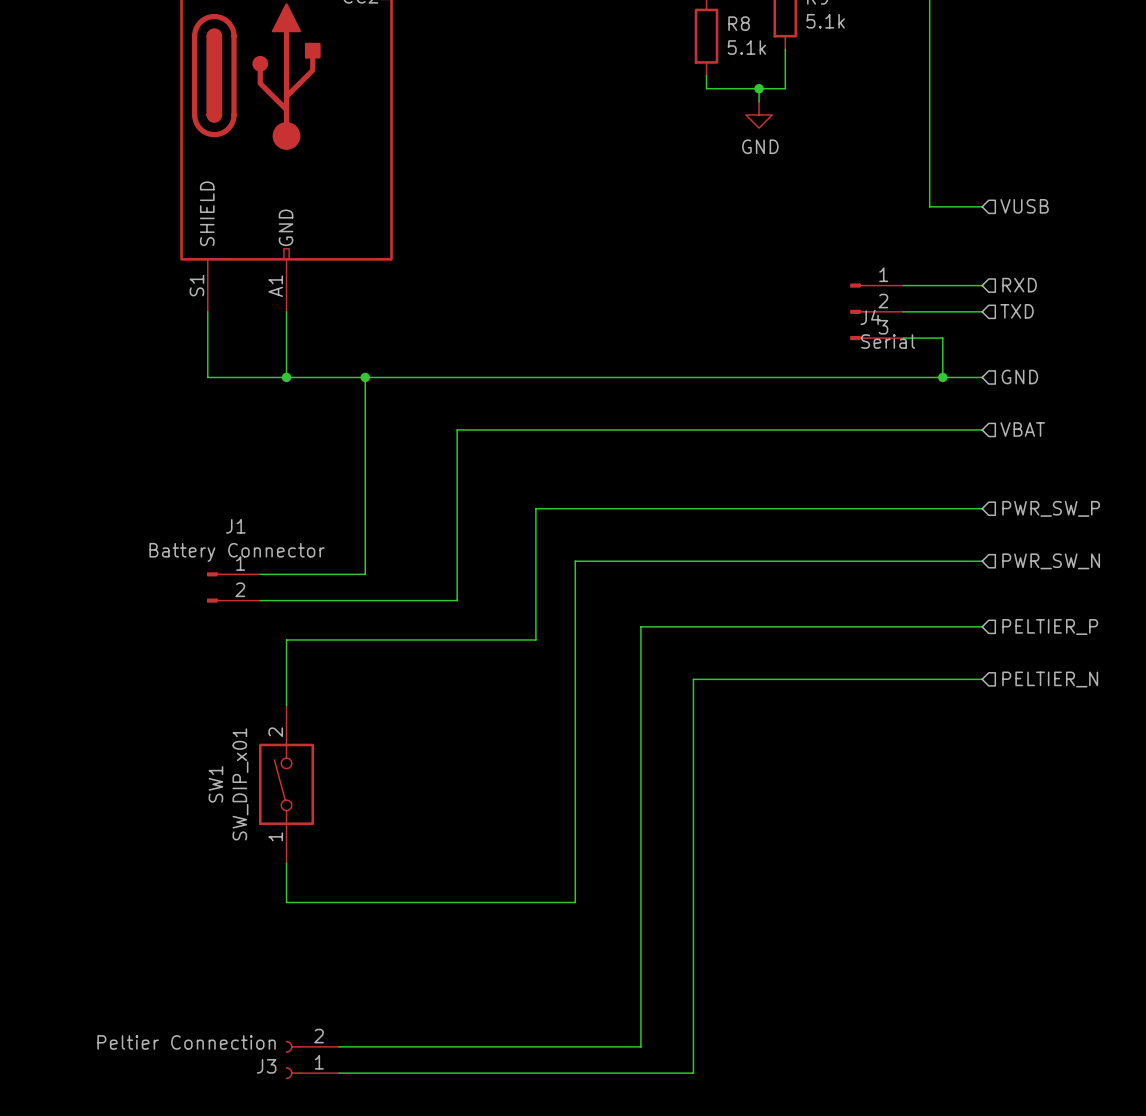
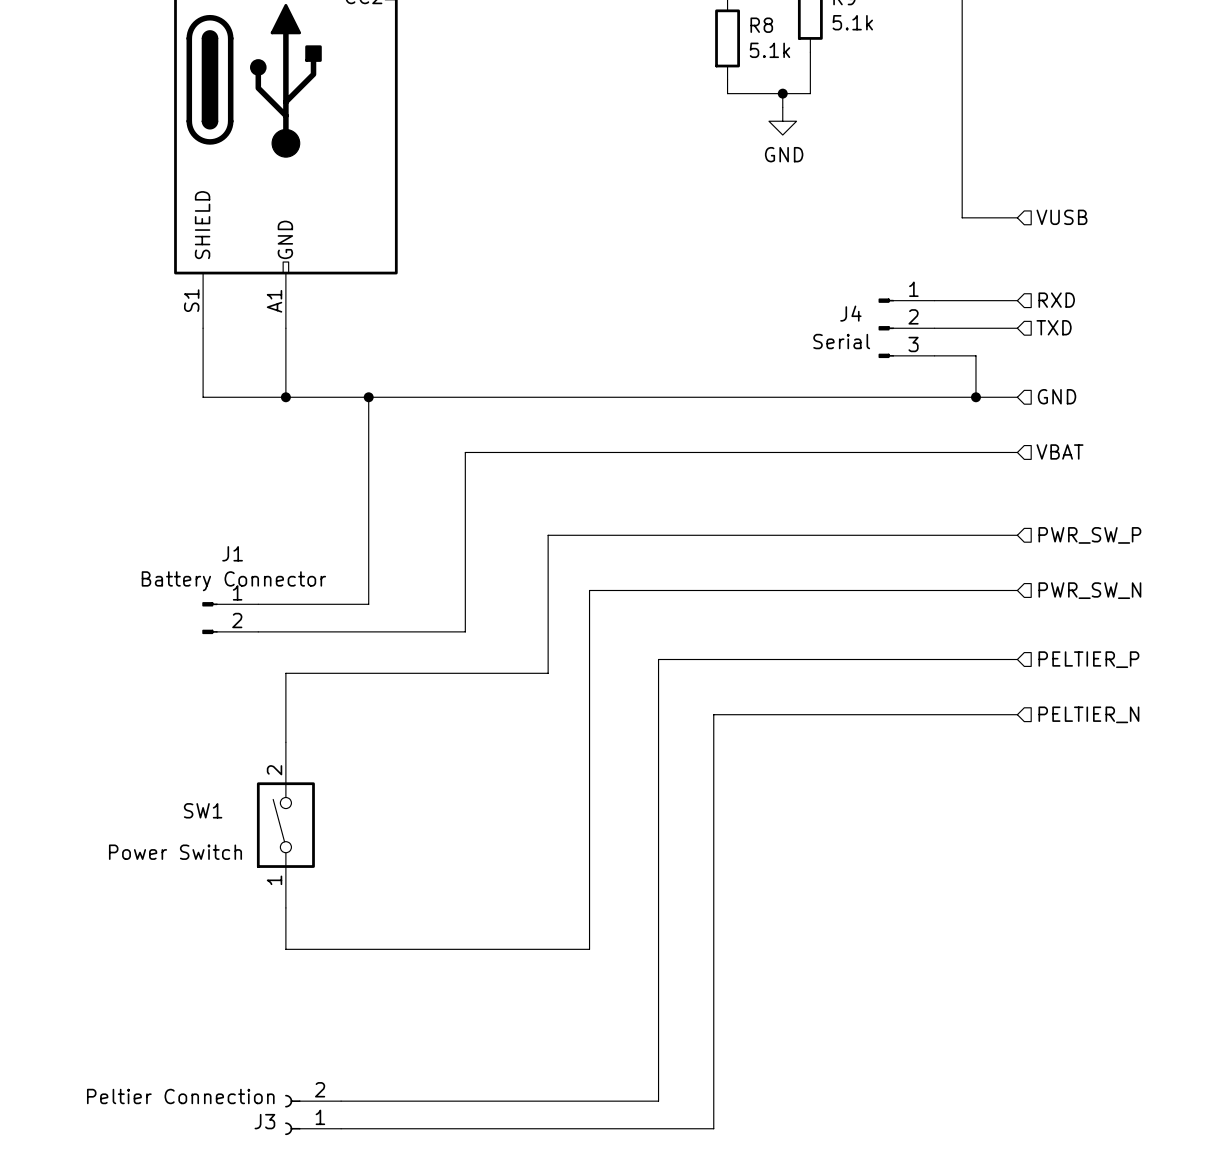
J4 name position: J4 (870, 317) -> J4 (850, 313)
J4 value position: Serial (888, 341) -> Serial (841, 341)
SW1 name rotation: 0° (215, 784) -> 90° clockwise (203, 810)
SW1 value: SW_DIP_x01 (240, 784) -> Power Switch (175, 852)

